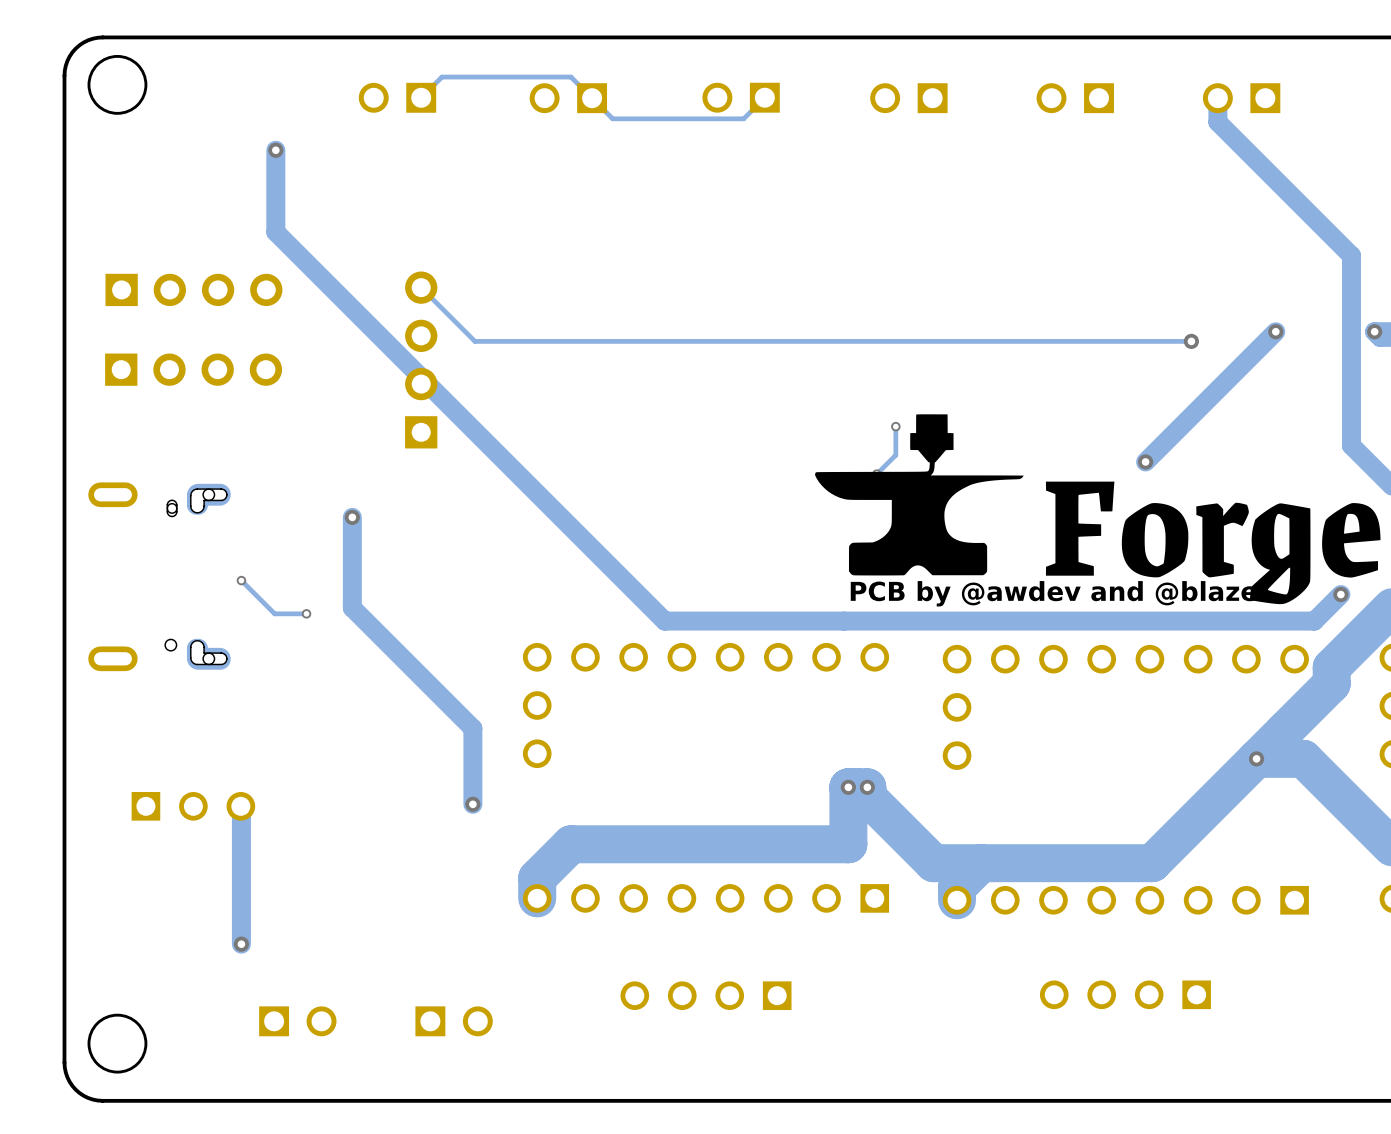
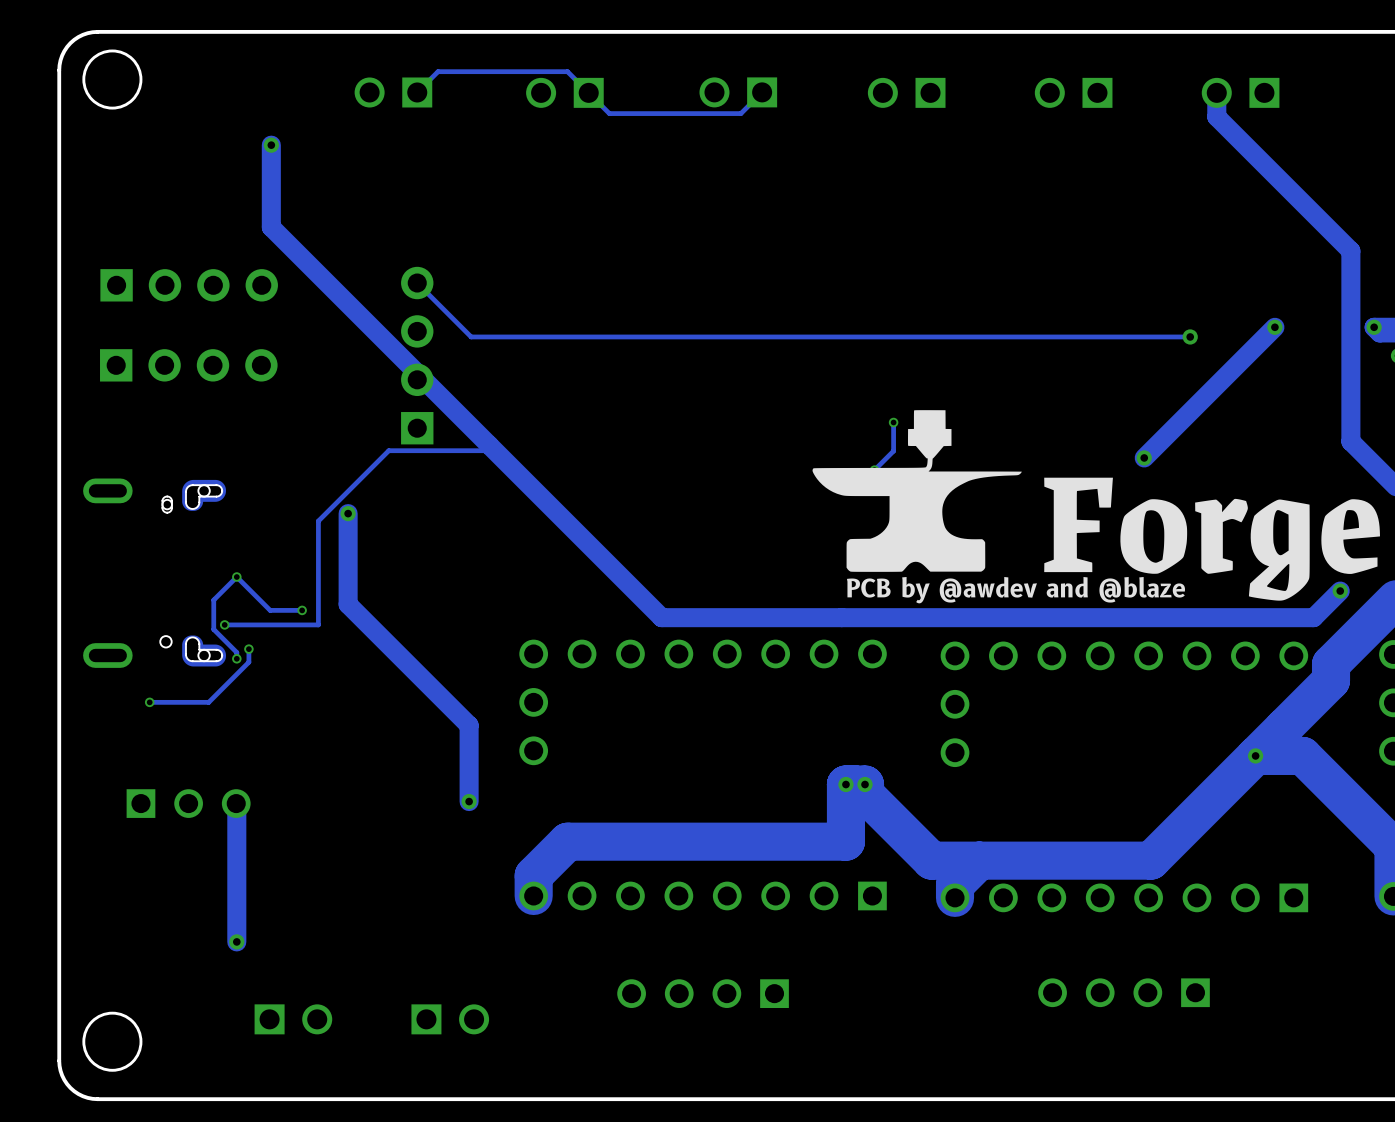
track: none -> (489, 445) (483, 450) (388, 450) (318, 521) (318, 624) (224, 624)
track: none -> (236, 577) (213, 600) (213, 629) (236, 652) (236, 658)
via: none -> (224, 624)
track: none -> (248, 649) (248, 662) (208, 702) (149, 702)
via: none -> (248, 649)
via: none -> (236, 658)
via: none -> (149, 702)

